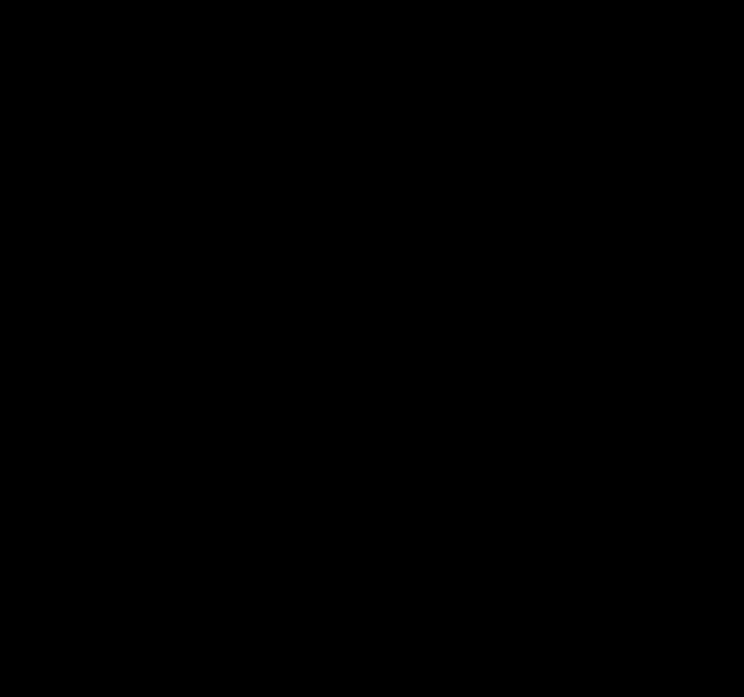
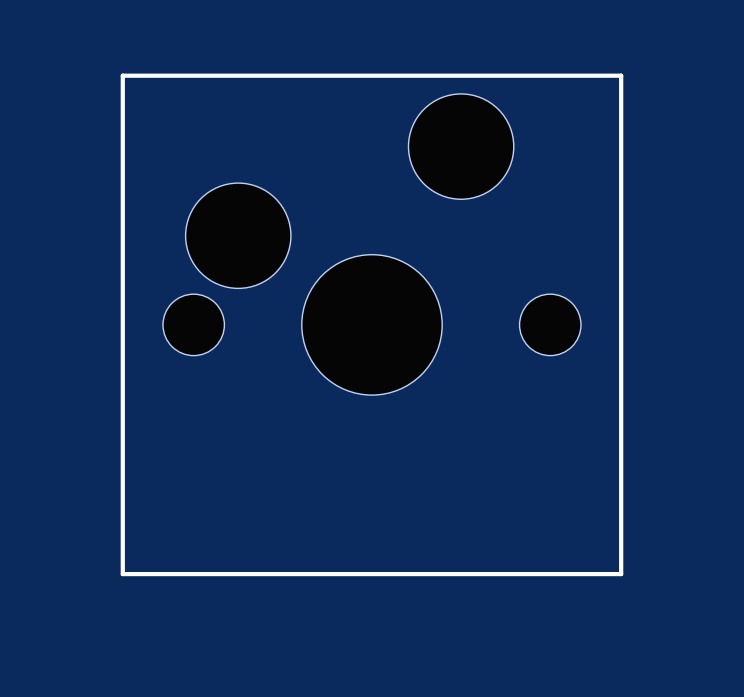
part: none -> (371, 324)

